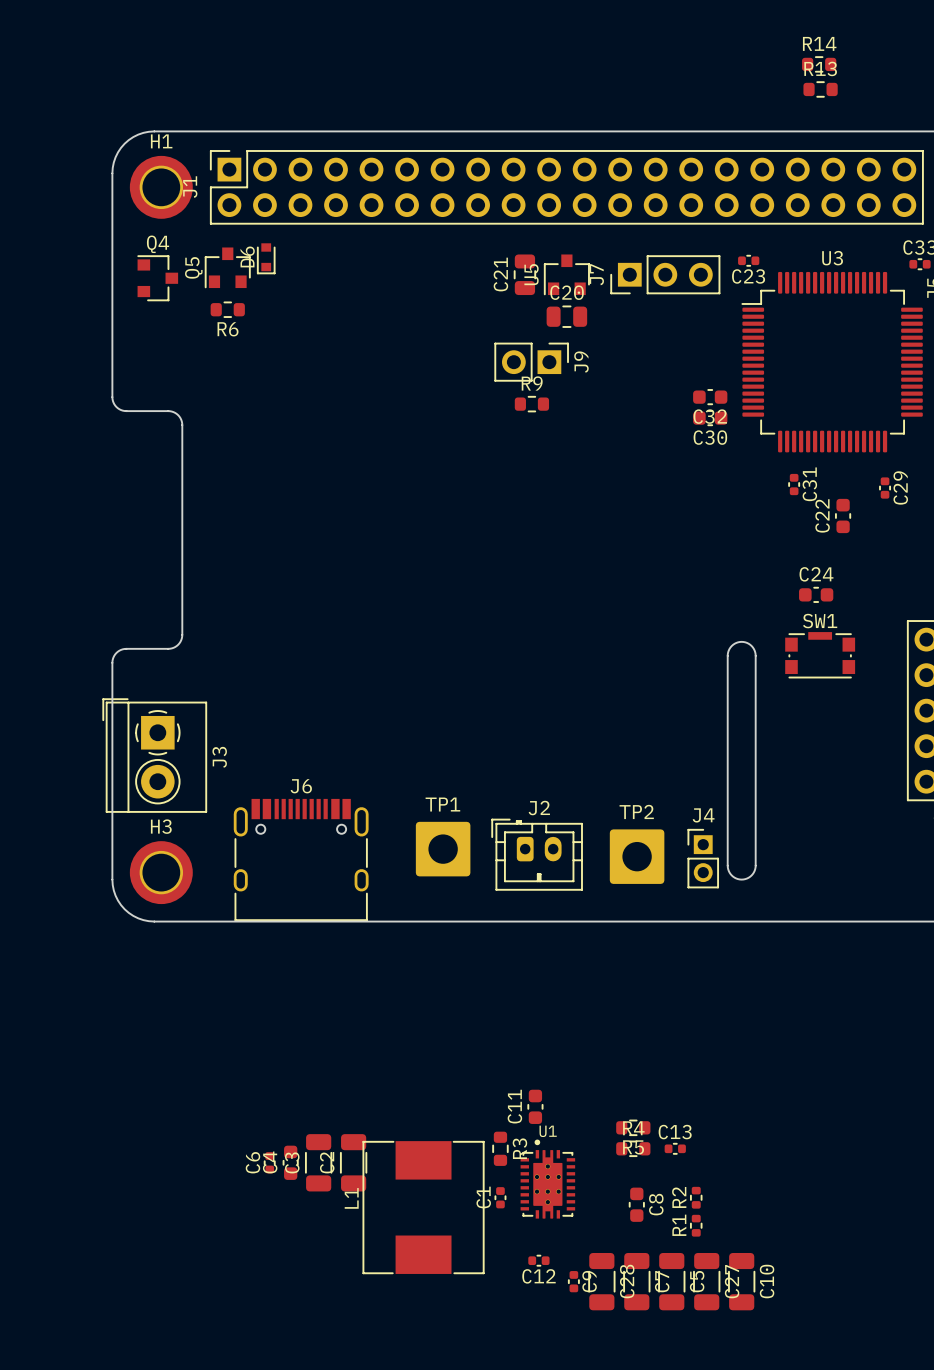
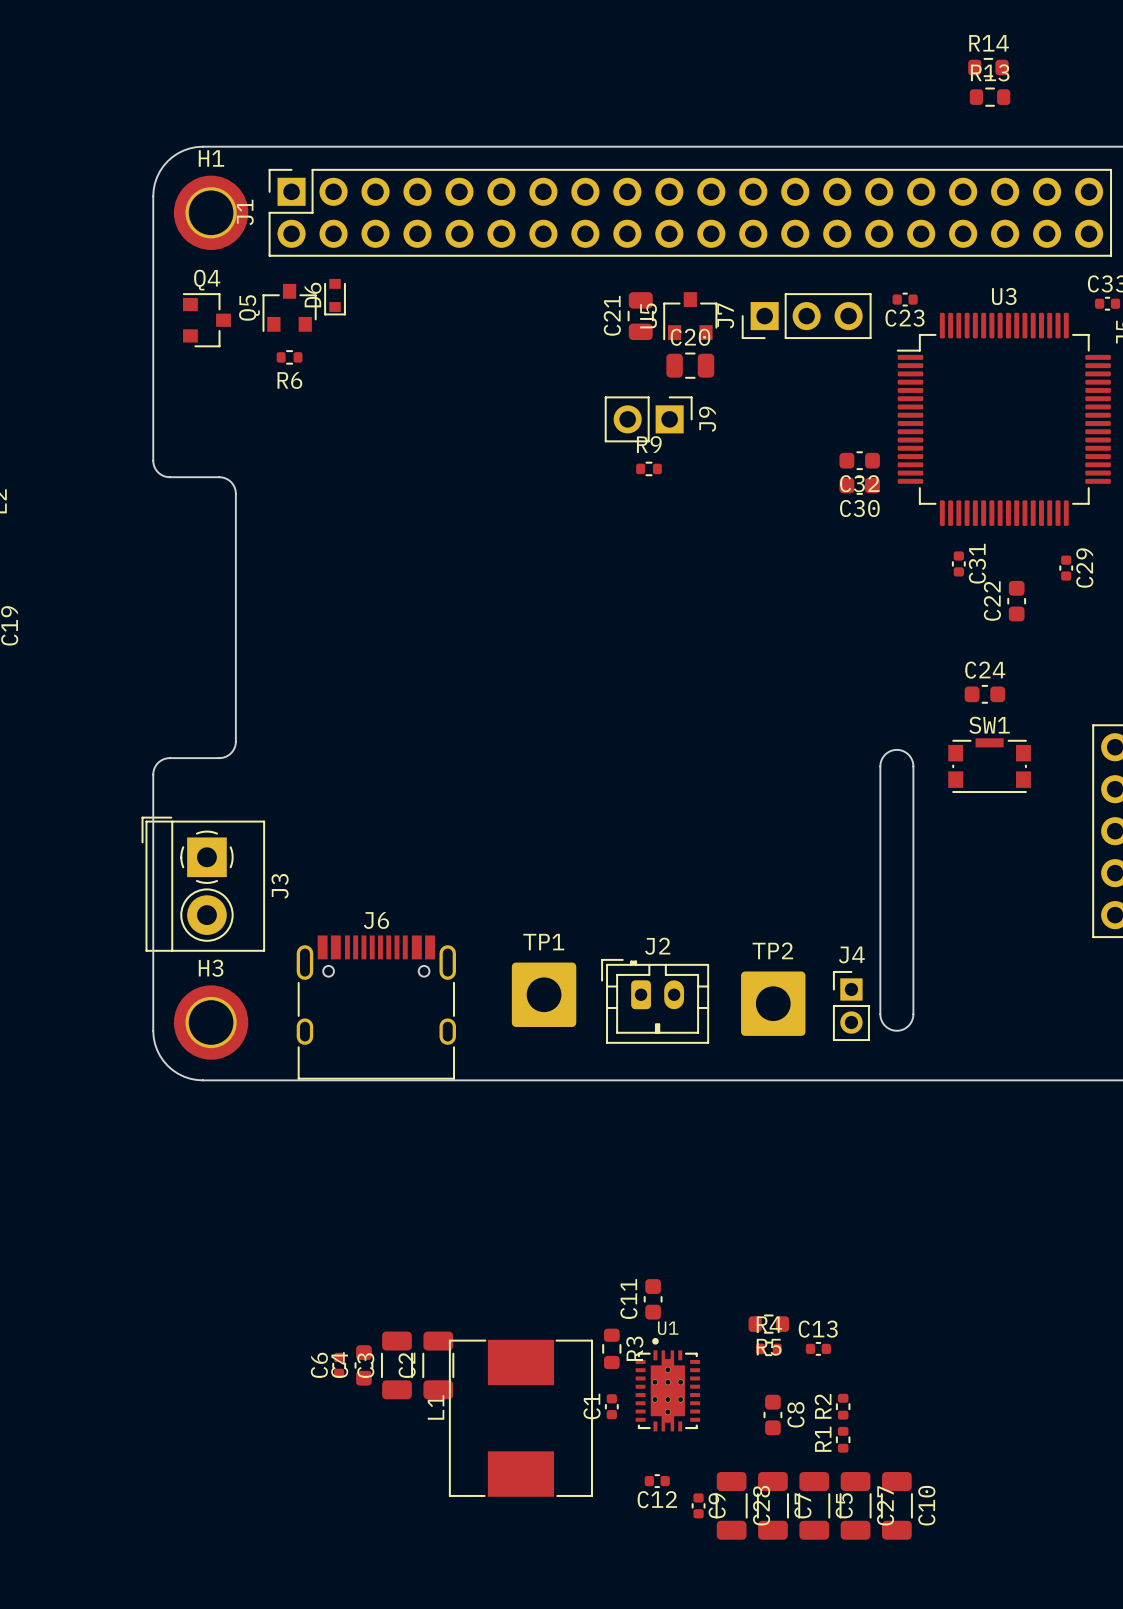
R6 footprint: [210, 301, 245, 318] -> [276, 350, 303, 365]
R9 footprint: [514, 395, 550, 413] -> [636, 461, 662, 477]
R4 footprint: [616, 1140, 651, 1157] -> [755, 1341, 782, 1357]

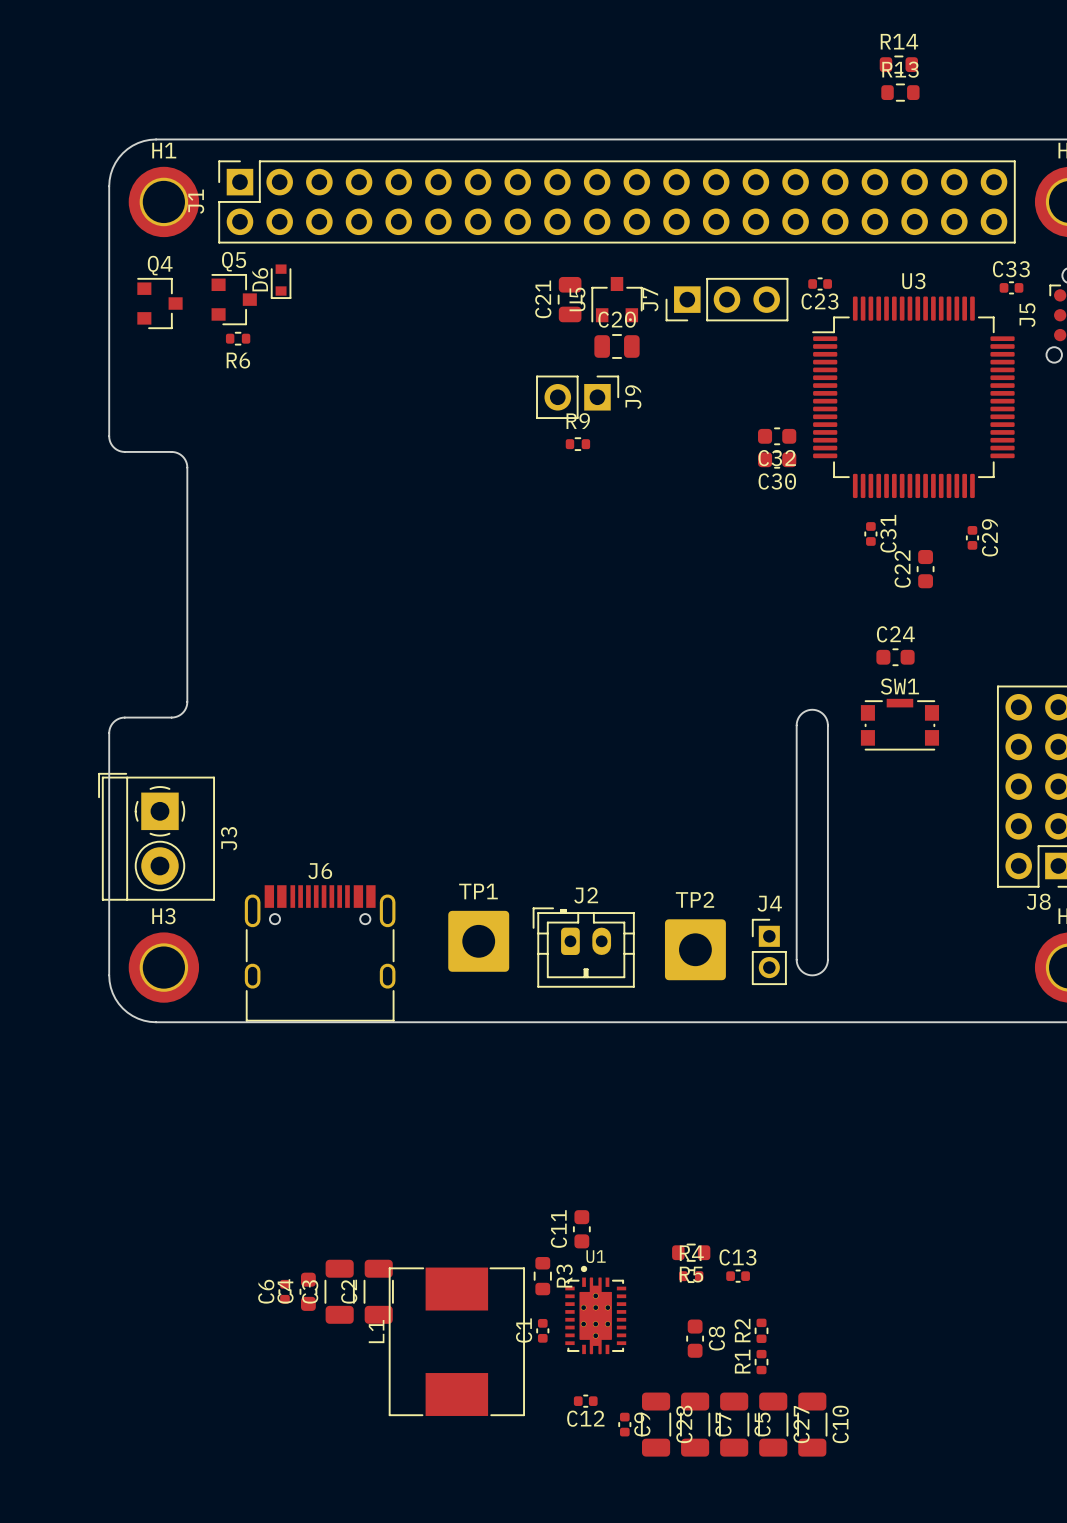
Q5 rotation: 0° (289, 307) -> 90° clockwise (234, 299)

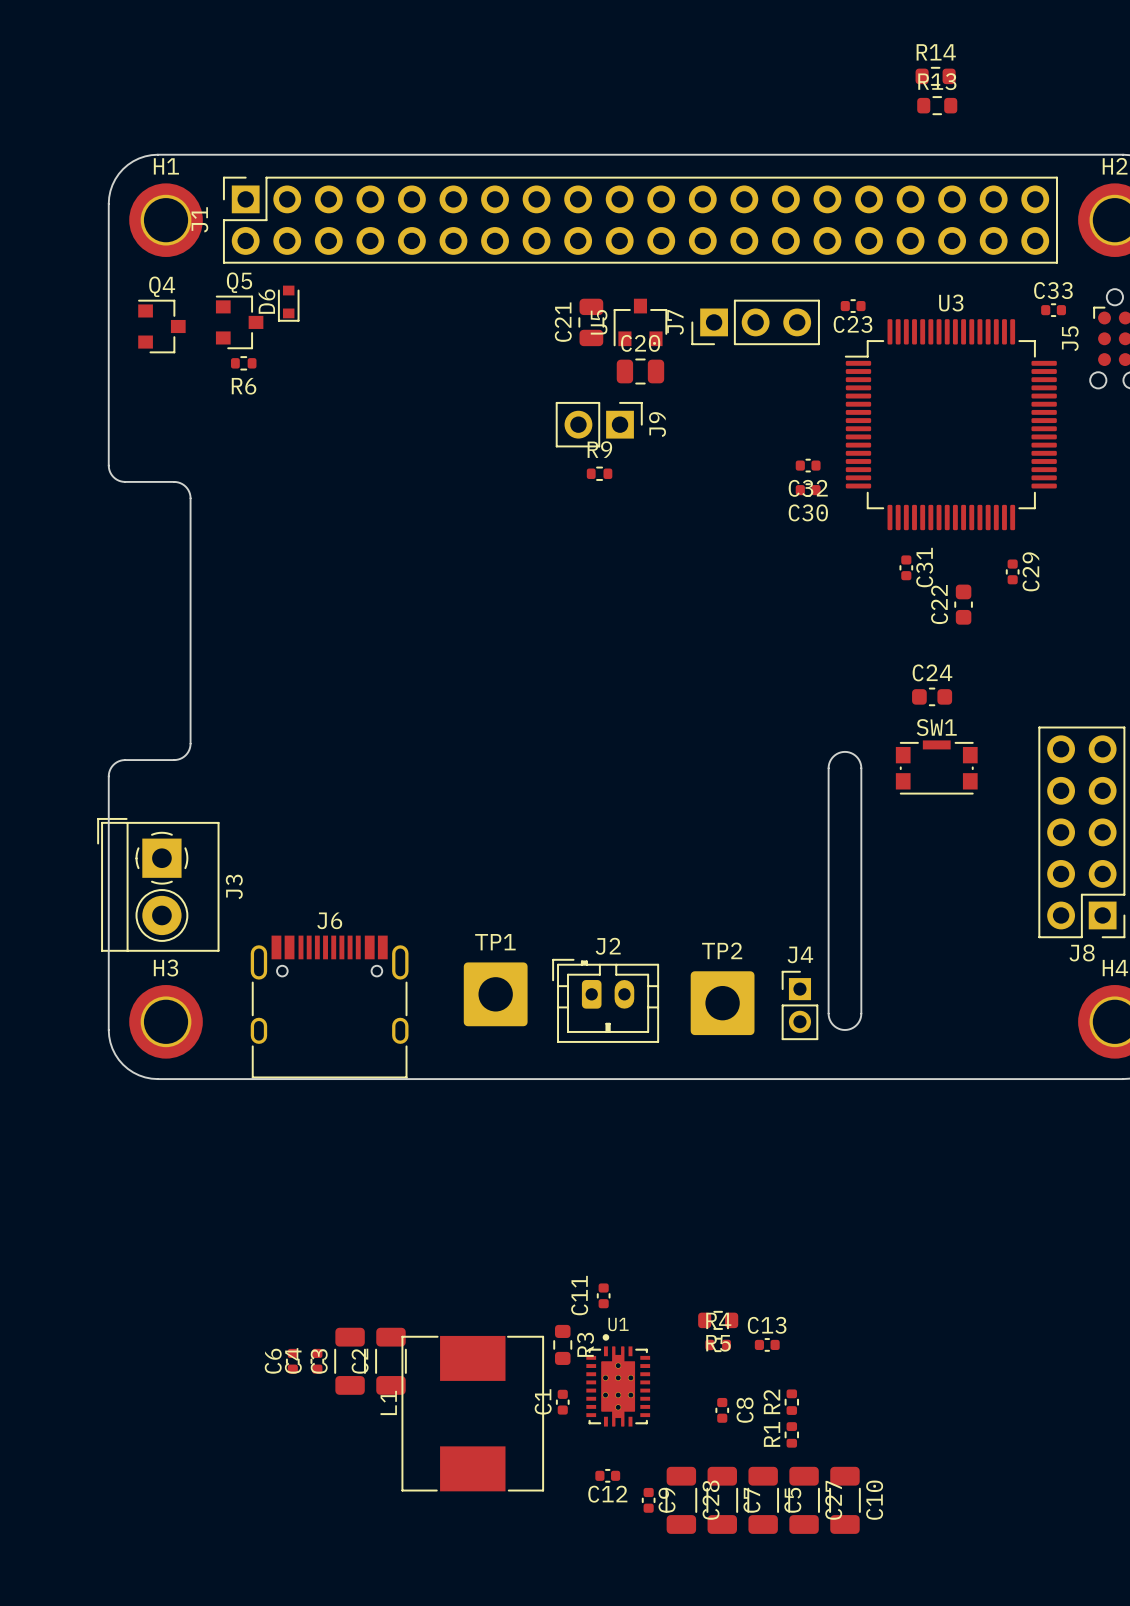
C32 footprint: [758, 427, 797, 446] -> [795, 458, 821, 473]
C30 footprint: [758, 450, 797, 469] -> [795, 483, 821, 497]
C11 footprint: [572, 1210, 591, 1249] -> [596, 1283, 611, 1309]
C4 footprint: [299, 1272, 318, 1311] -> [310, 1348, 325, 1374]
C8 footprint: [686, 1319, 705, 1358] -> [715, 1397, 730, 1423]

